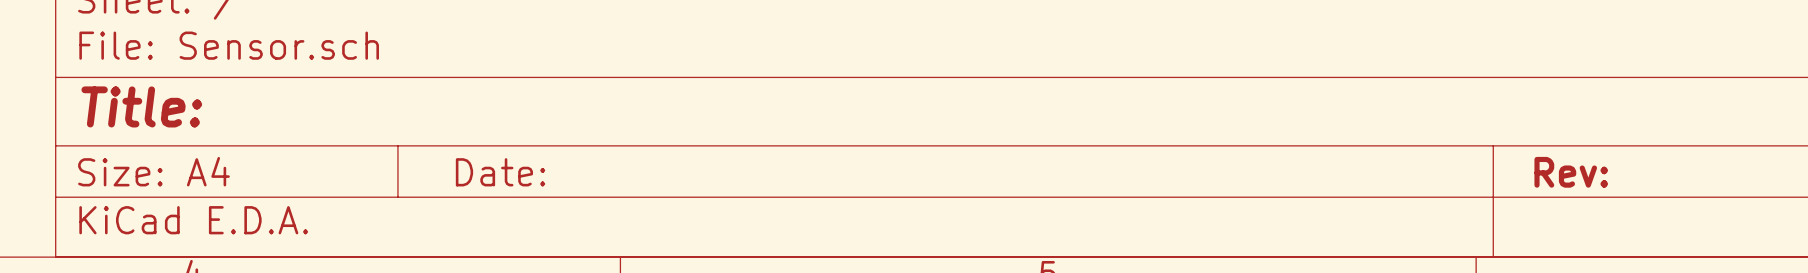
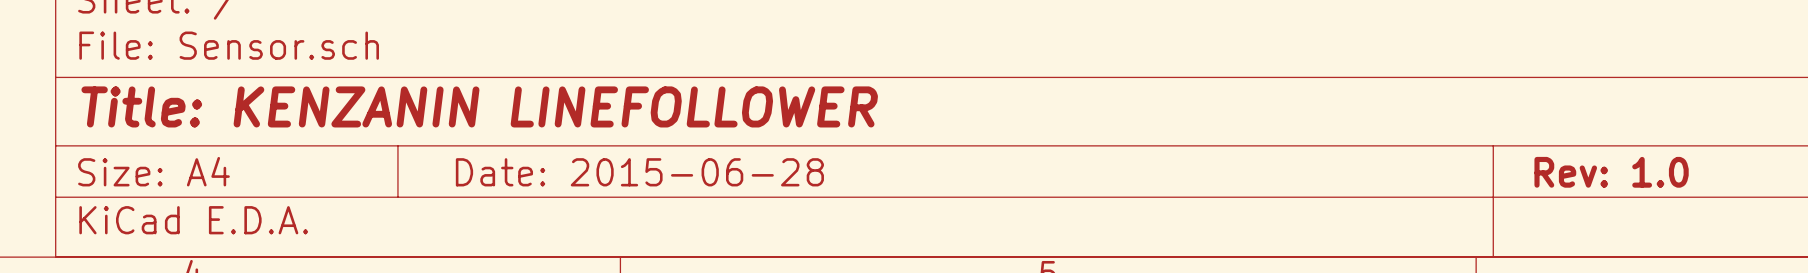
title block: Title: (141, 106) -> Title: KENZANIN LINEFOLLOWER (479, 106)
title block: Date: (500, 172) -> Date: 2015-06-28 (639, 172)
title block: Rev: (1571, 172) -> Rev: 1.0 (1611, 172)

